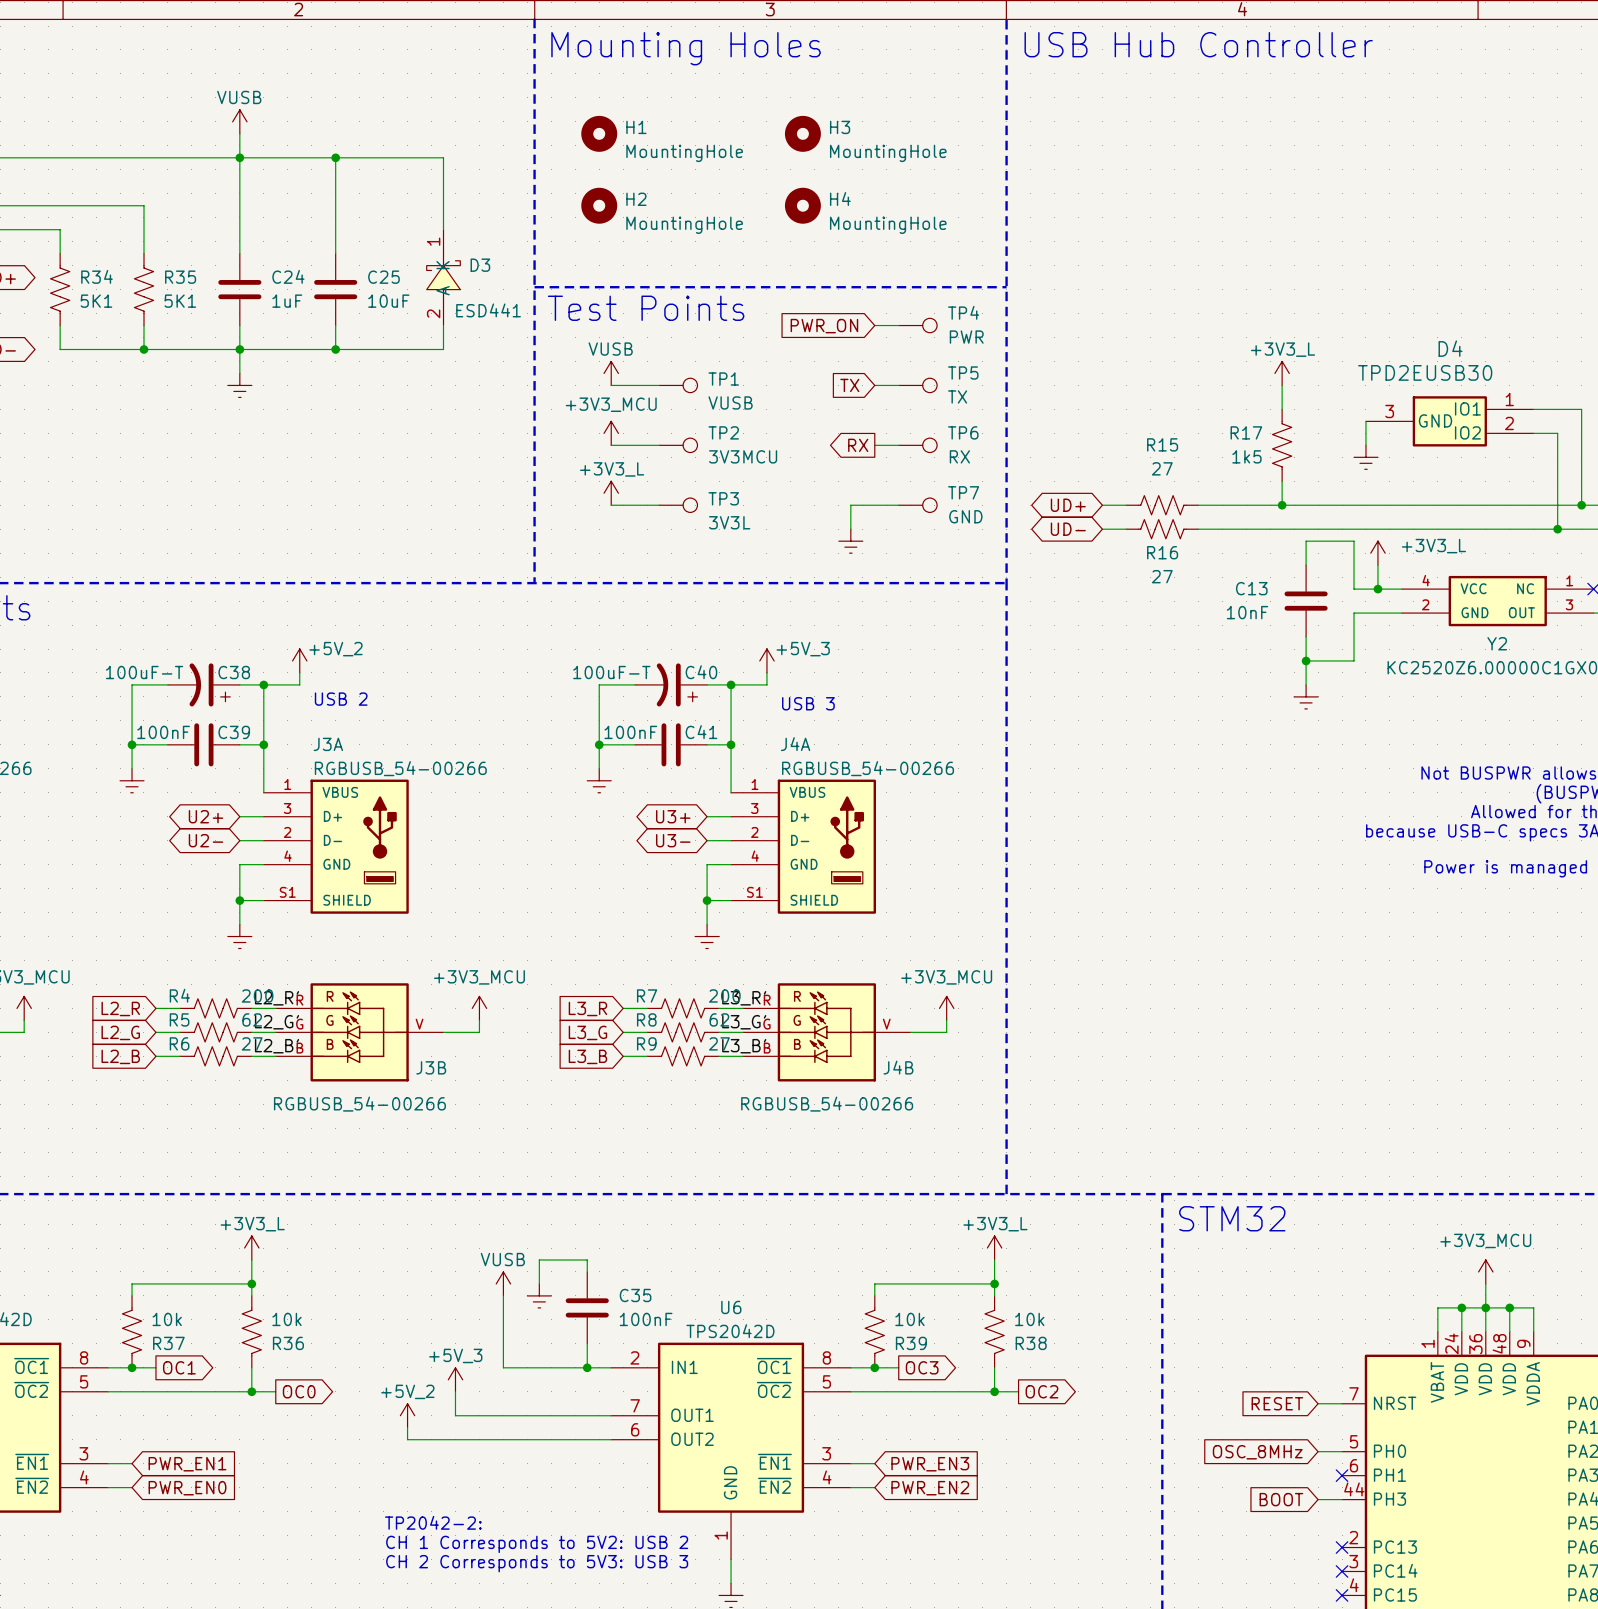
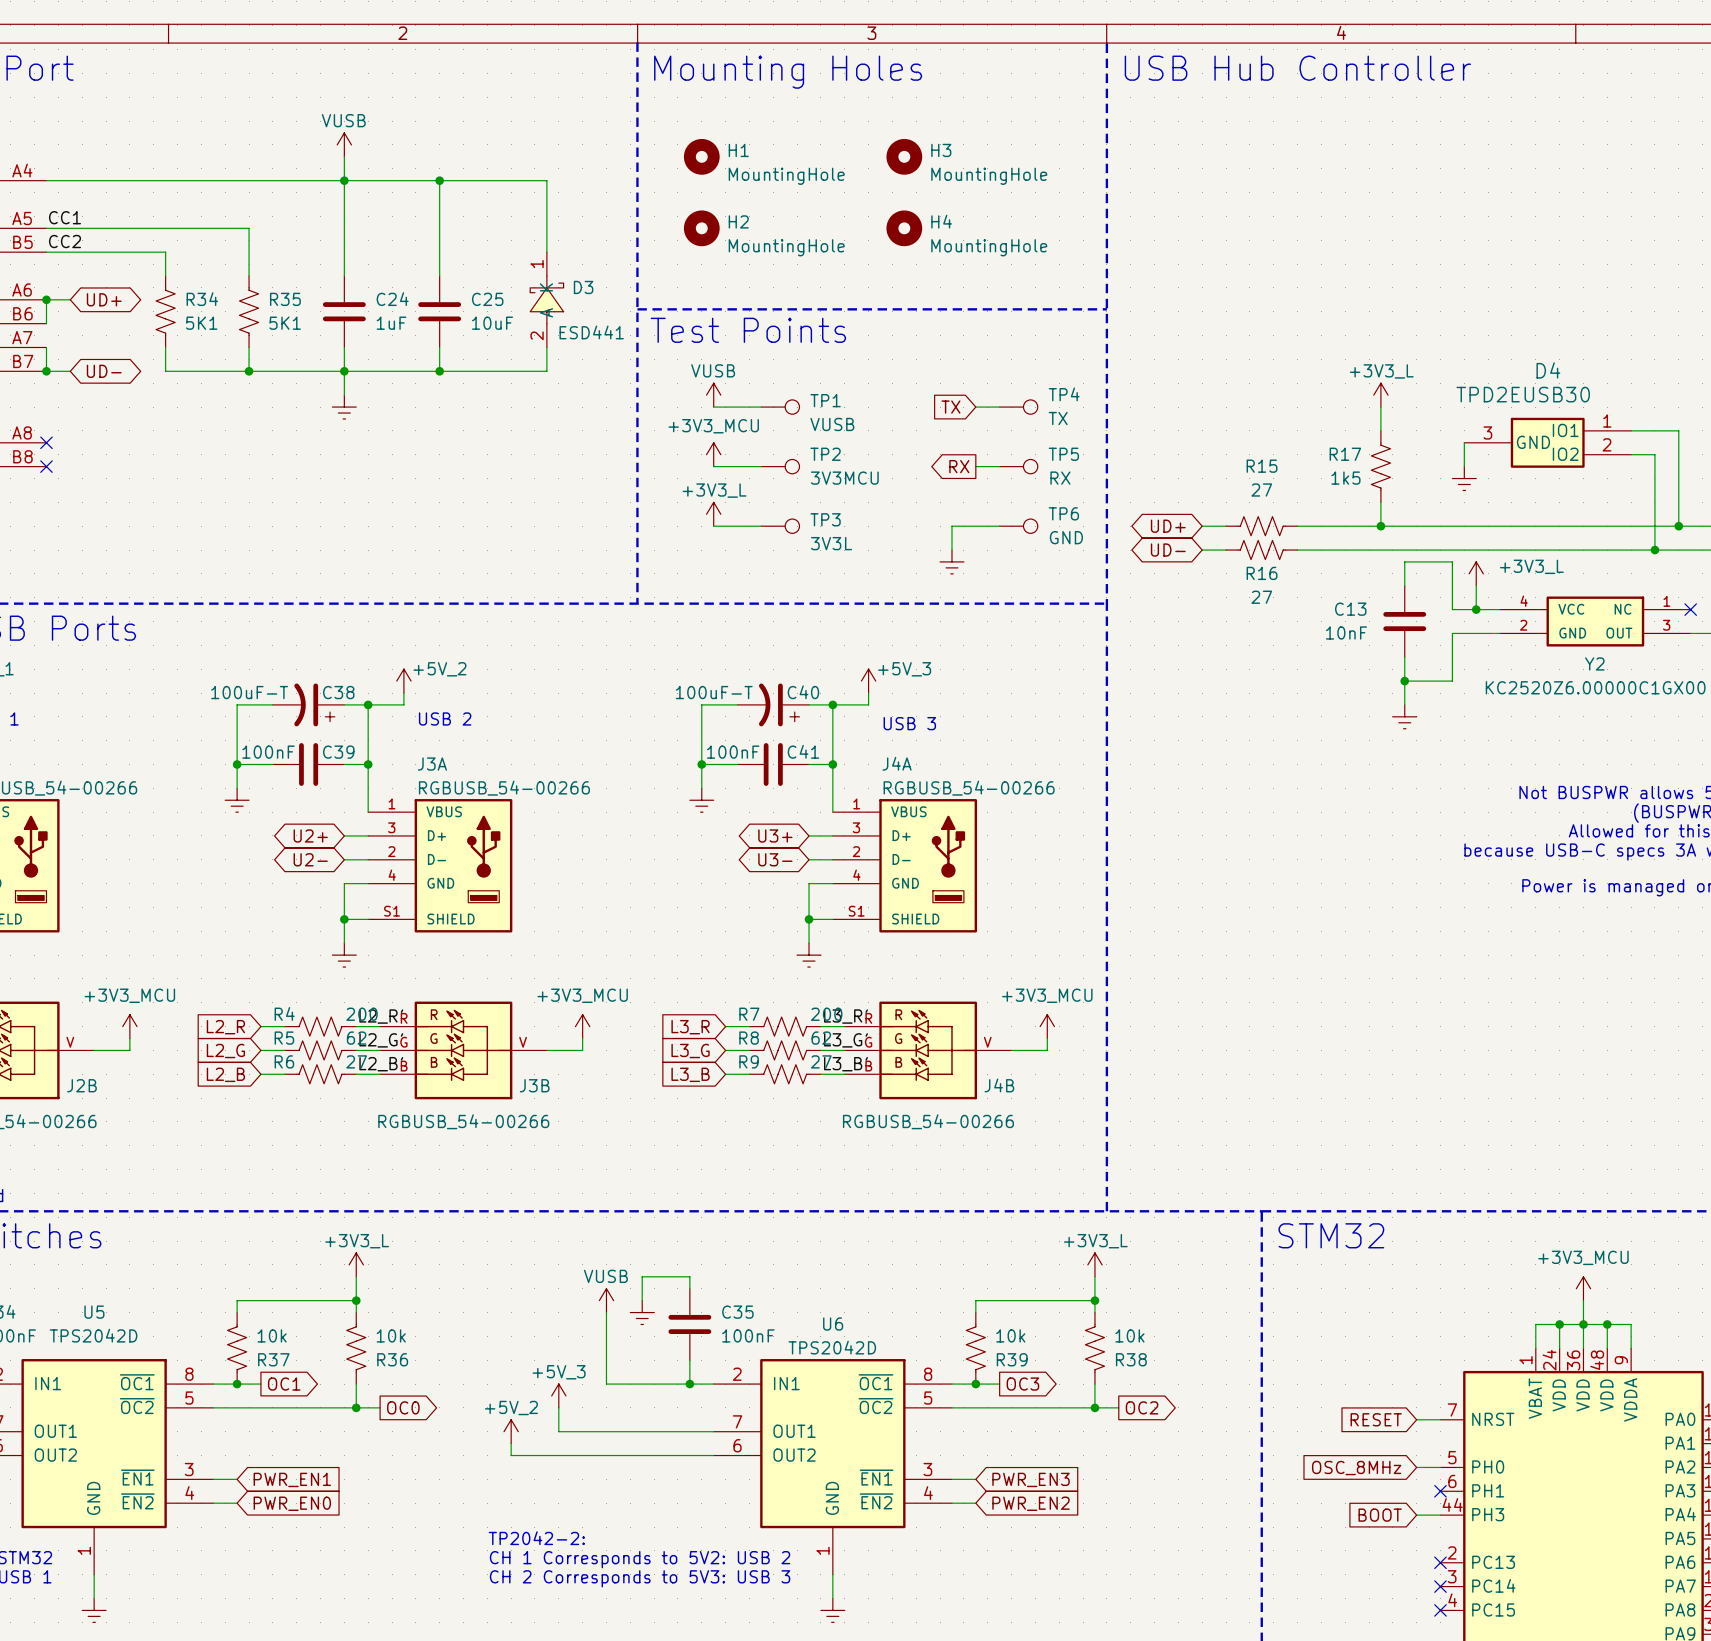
wire: (874, 325) (898, 325) -> none
TP4: PWR (917, 325) -> none
global label: PWR_ON (824, 326) -> none
TP5 name: TP5 (963, 373) -> TP4 (1064, 394)
TP6 name: TP6 (963, 432) -> TP5 (1063, 454)
TP7 name: TP7 (963, 492) -> TP6 (1063, 513)

